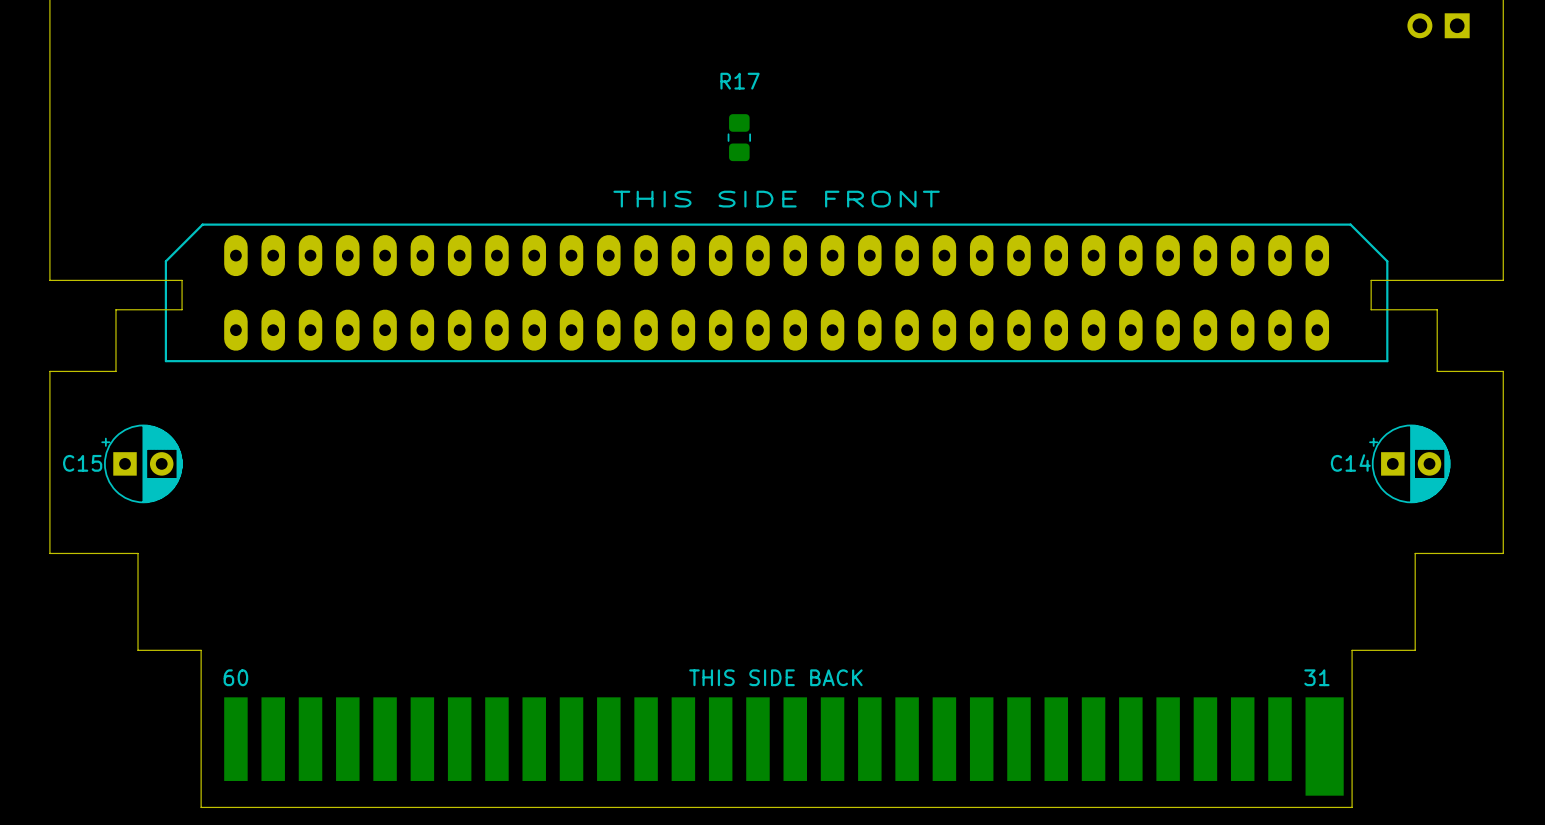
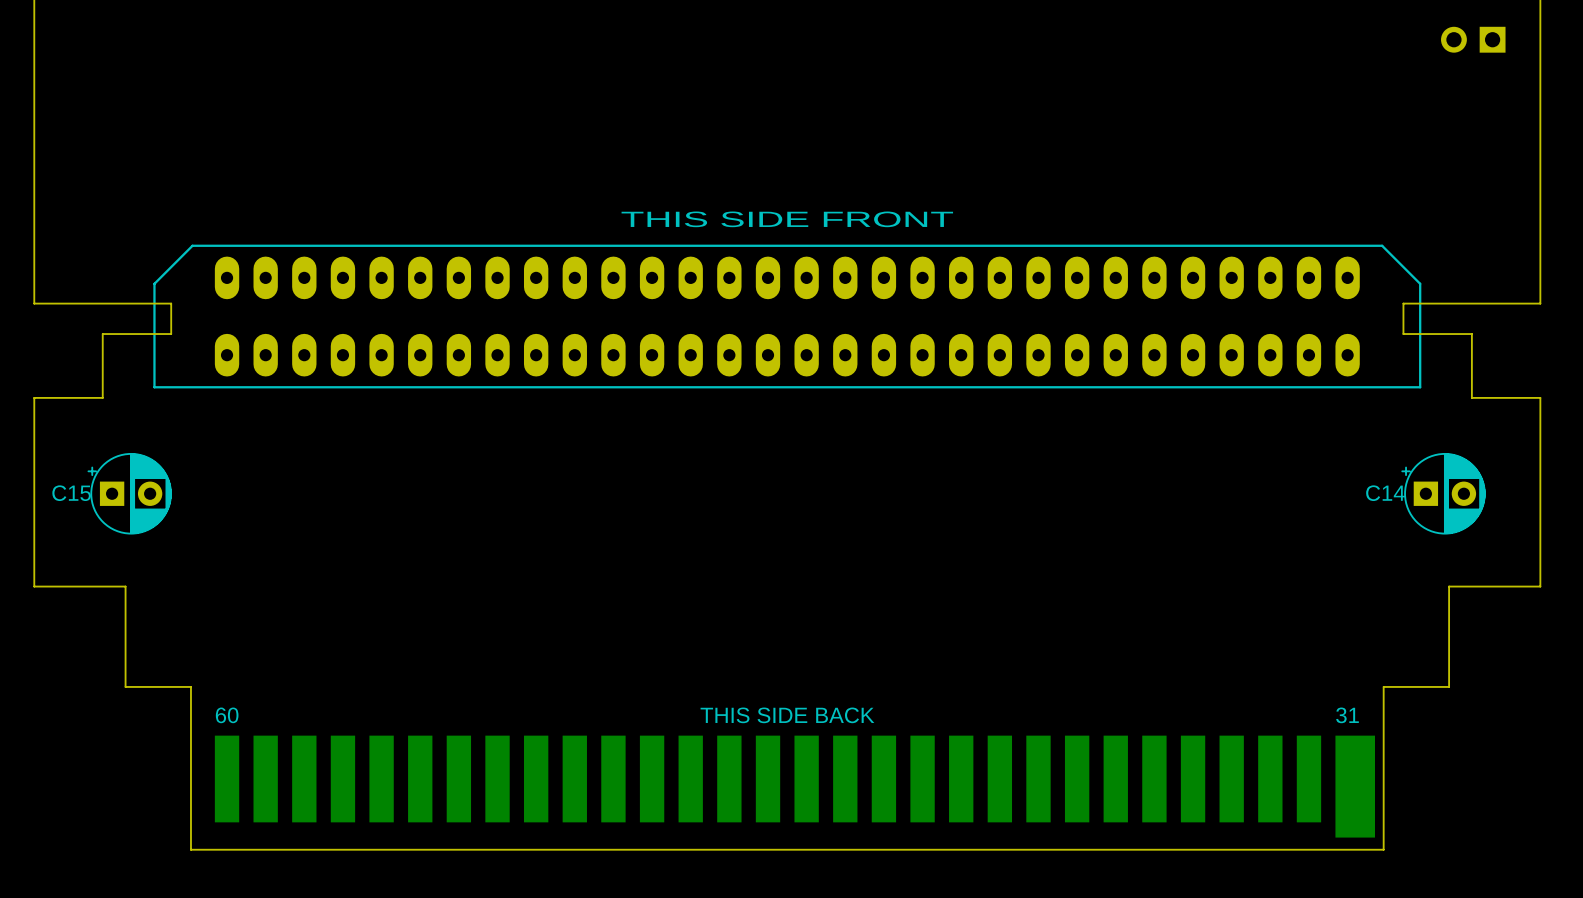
R17: (739, 137) -> none

